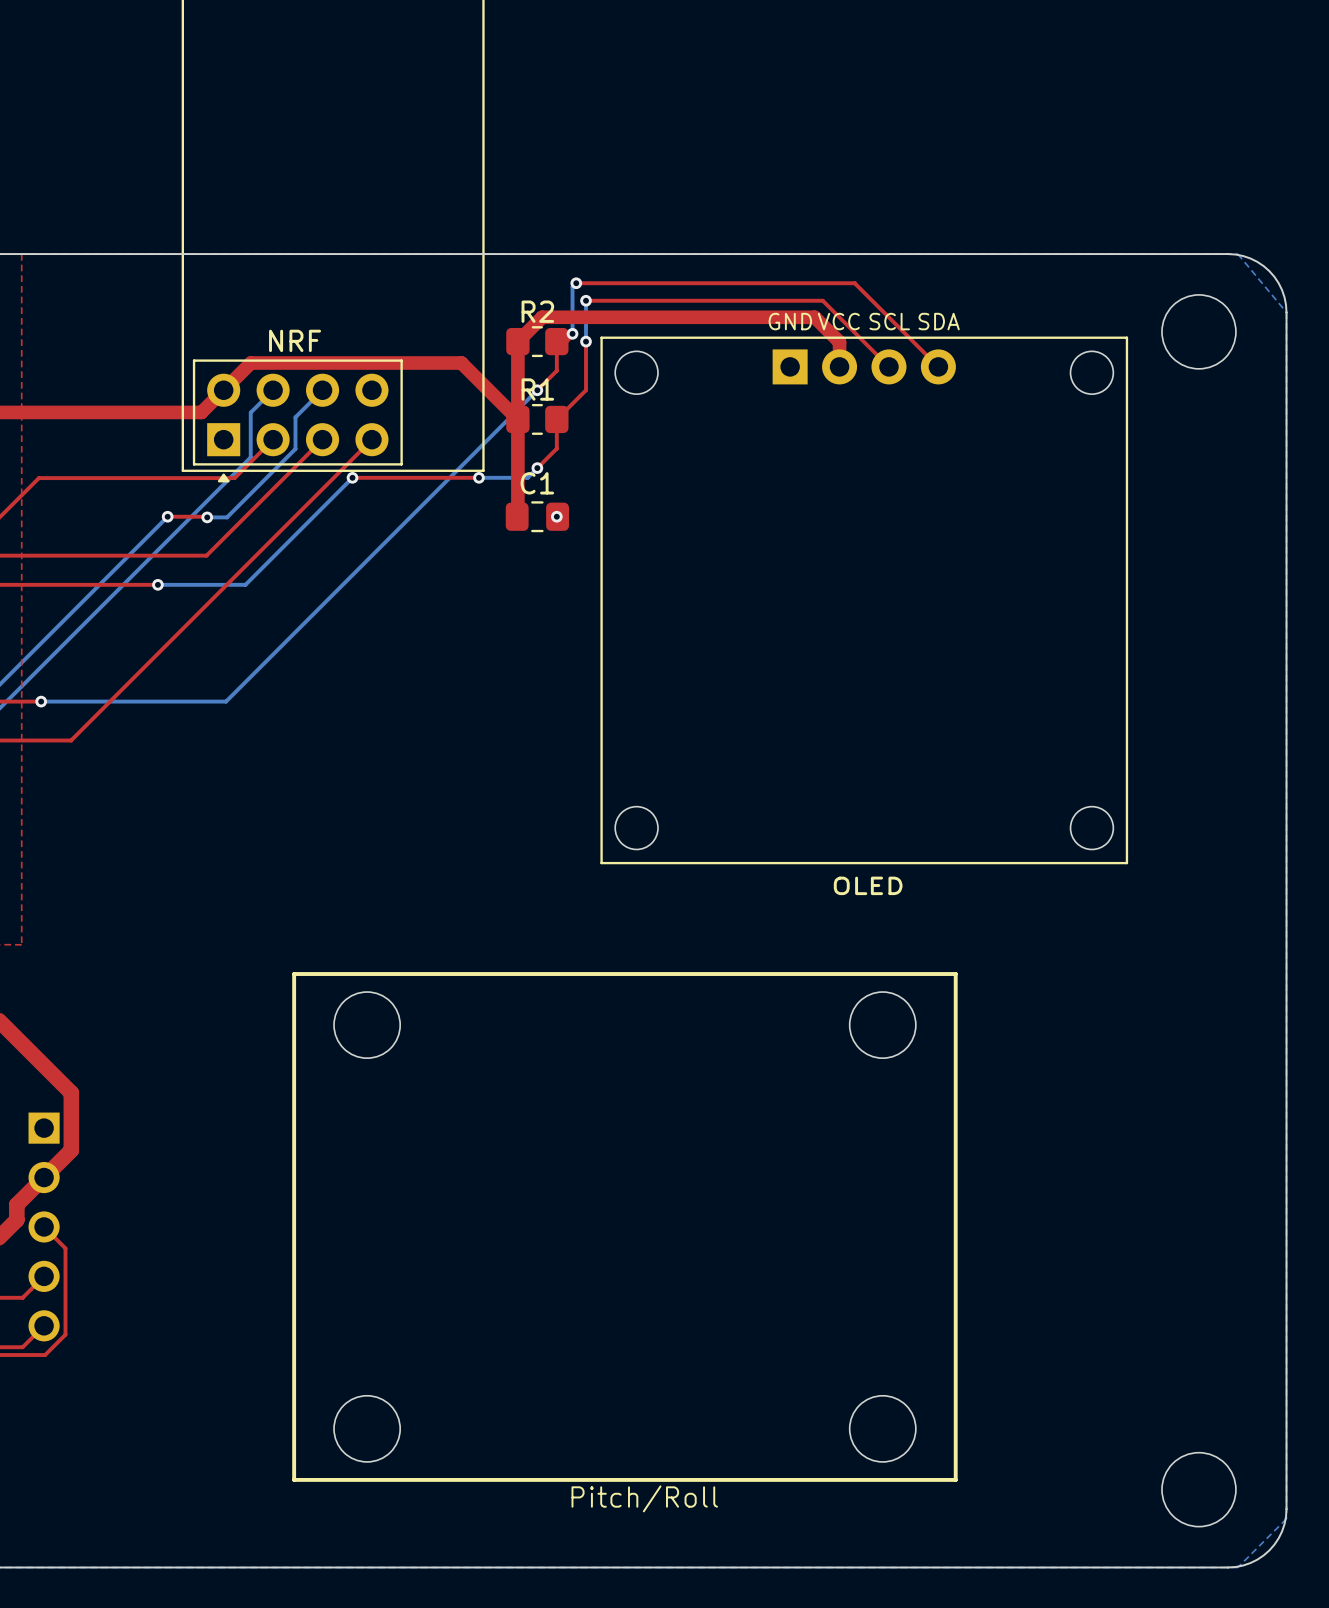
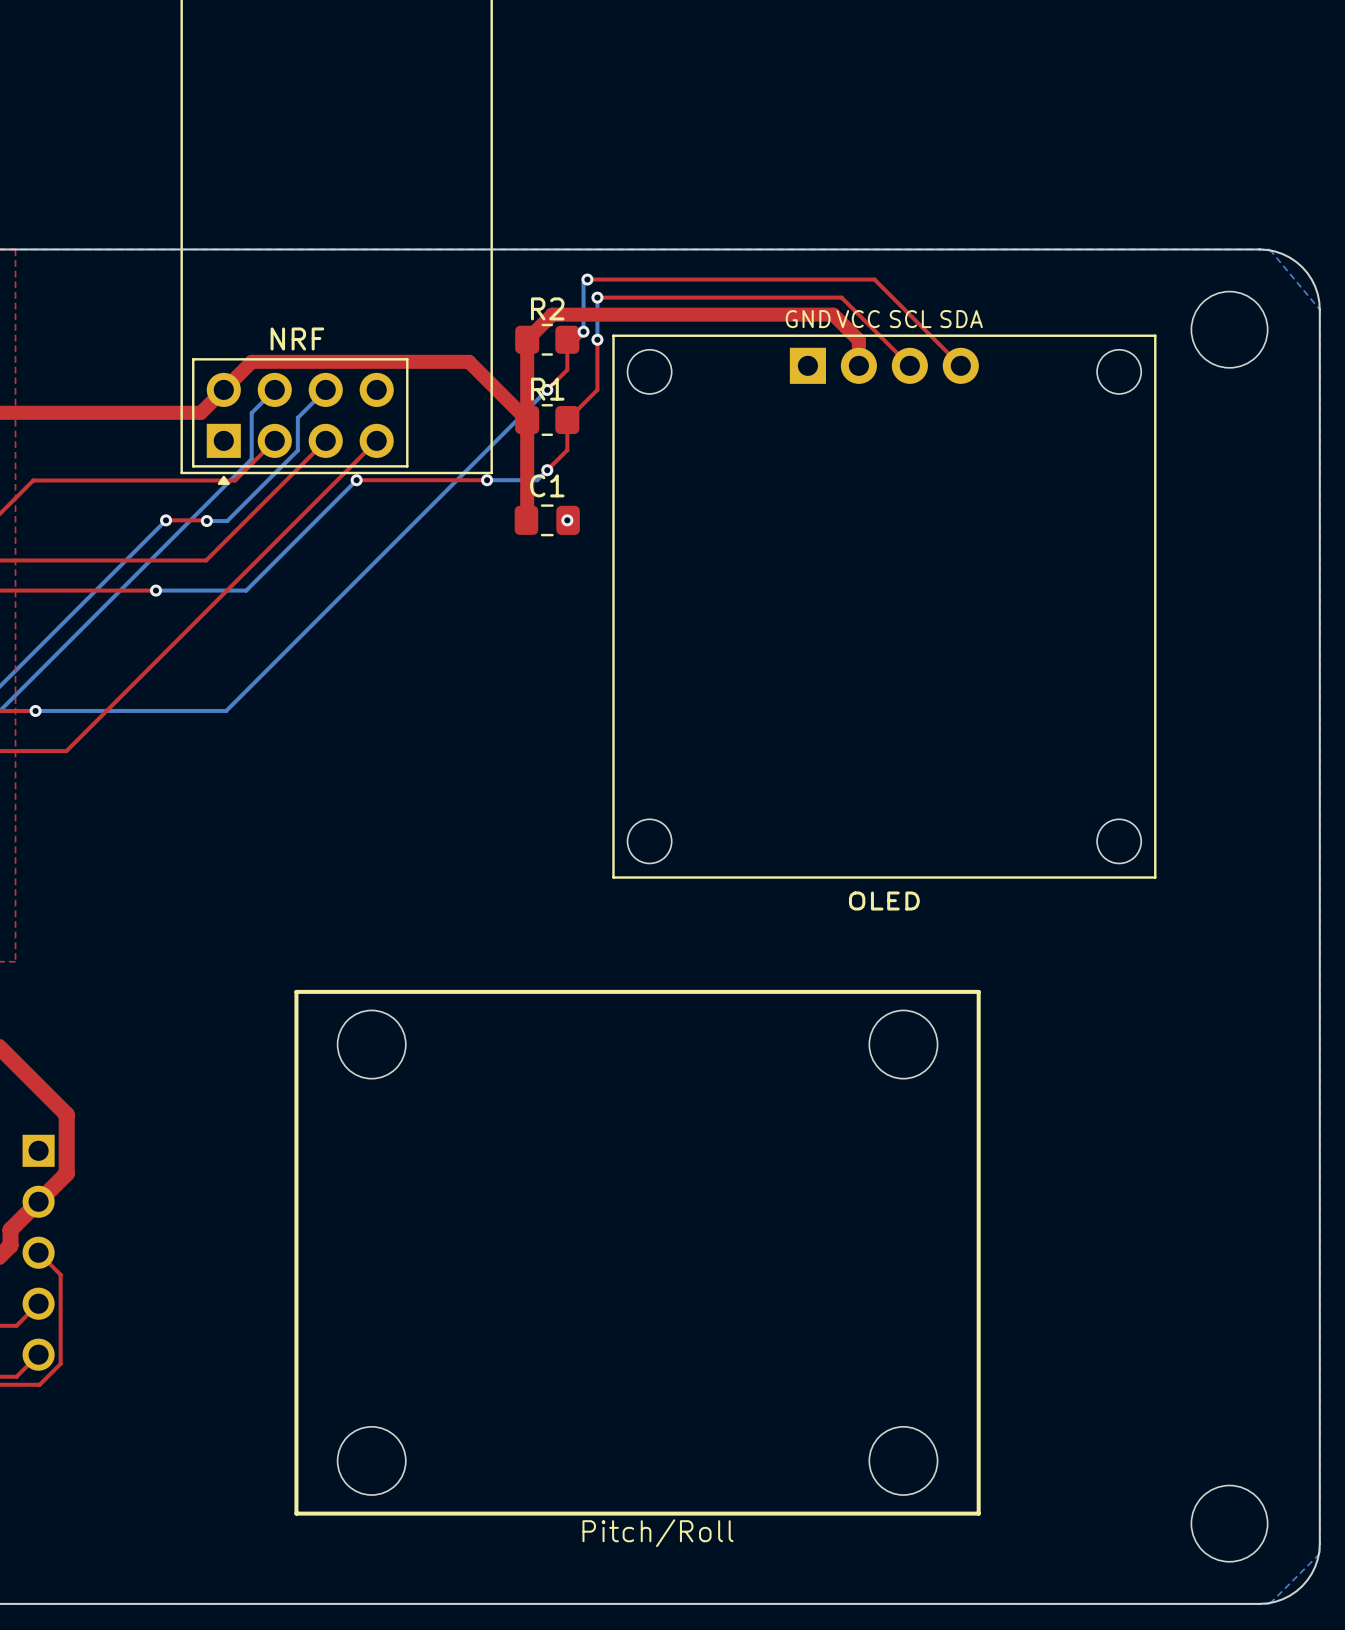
OLED name: none -> OLED (884, 900)
text: OLED (868, 885) -> none

